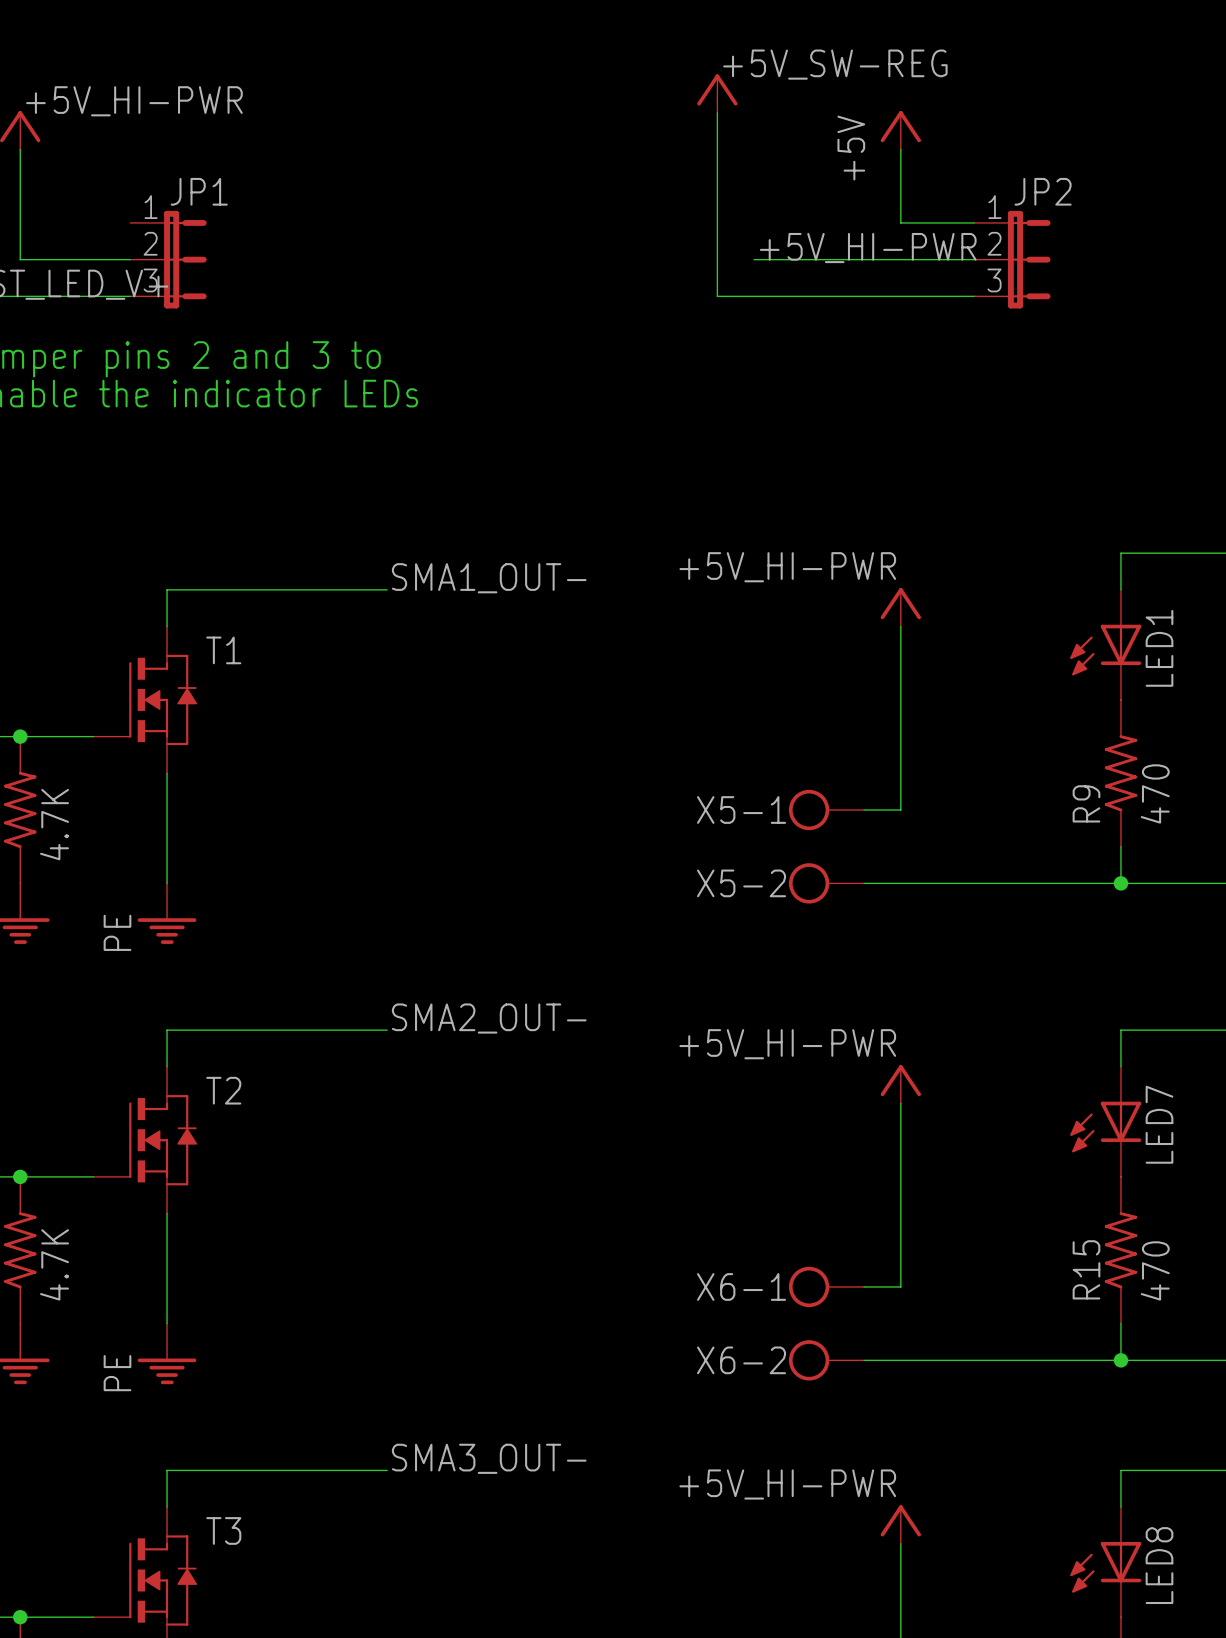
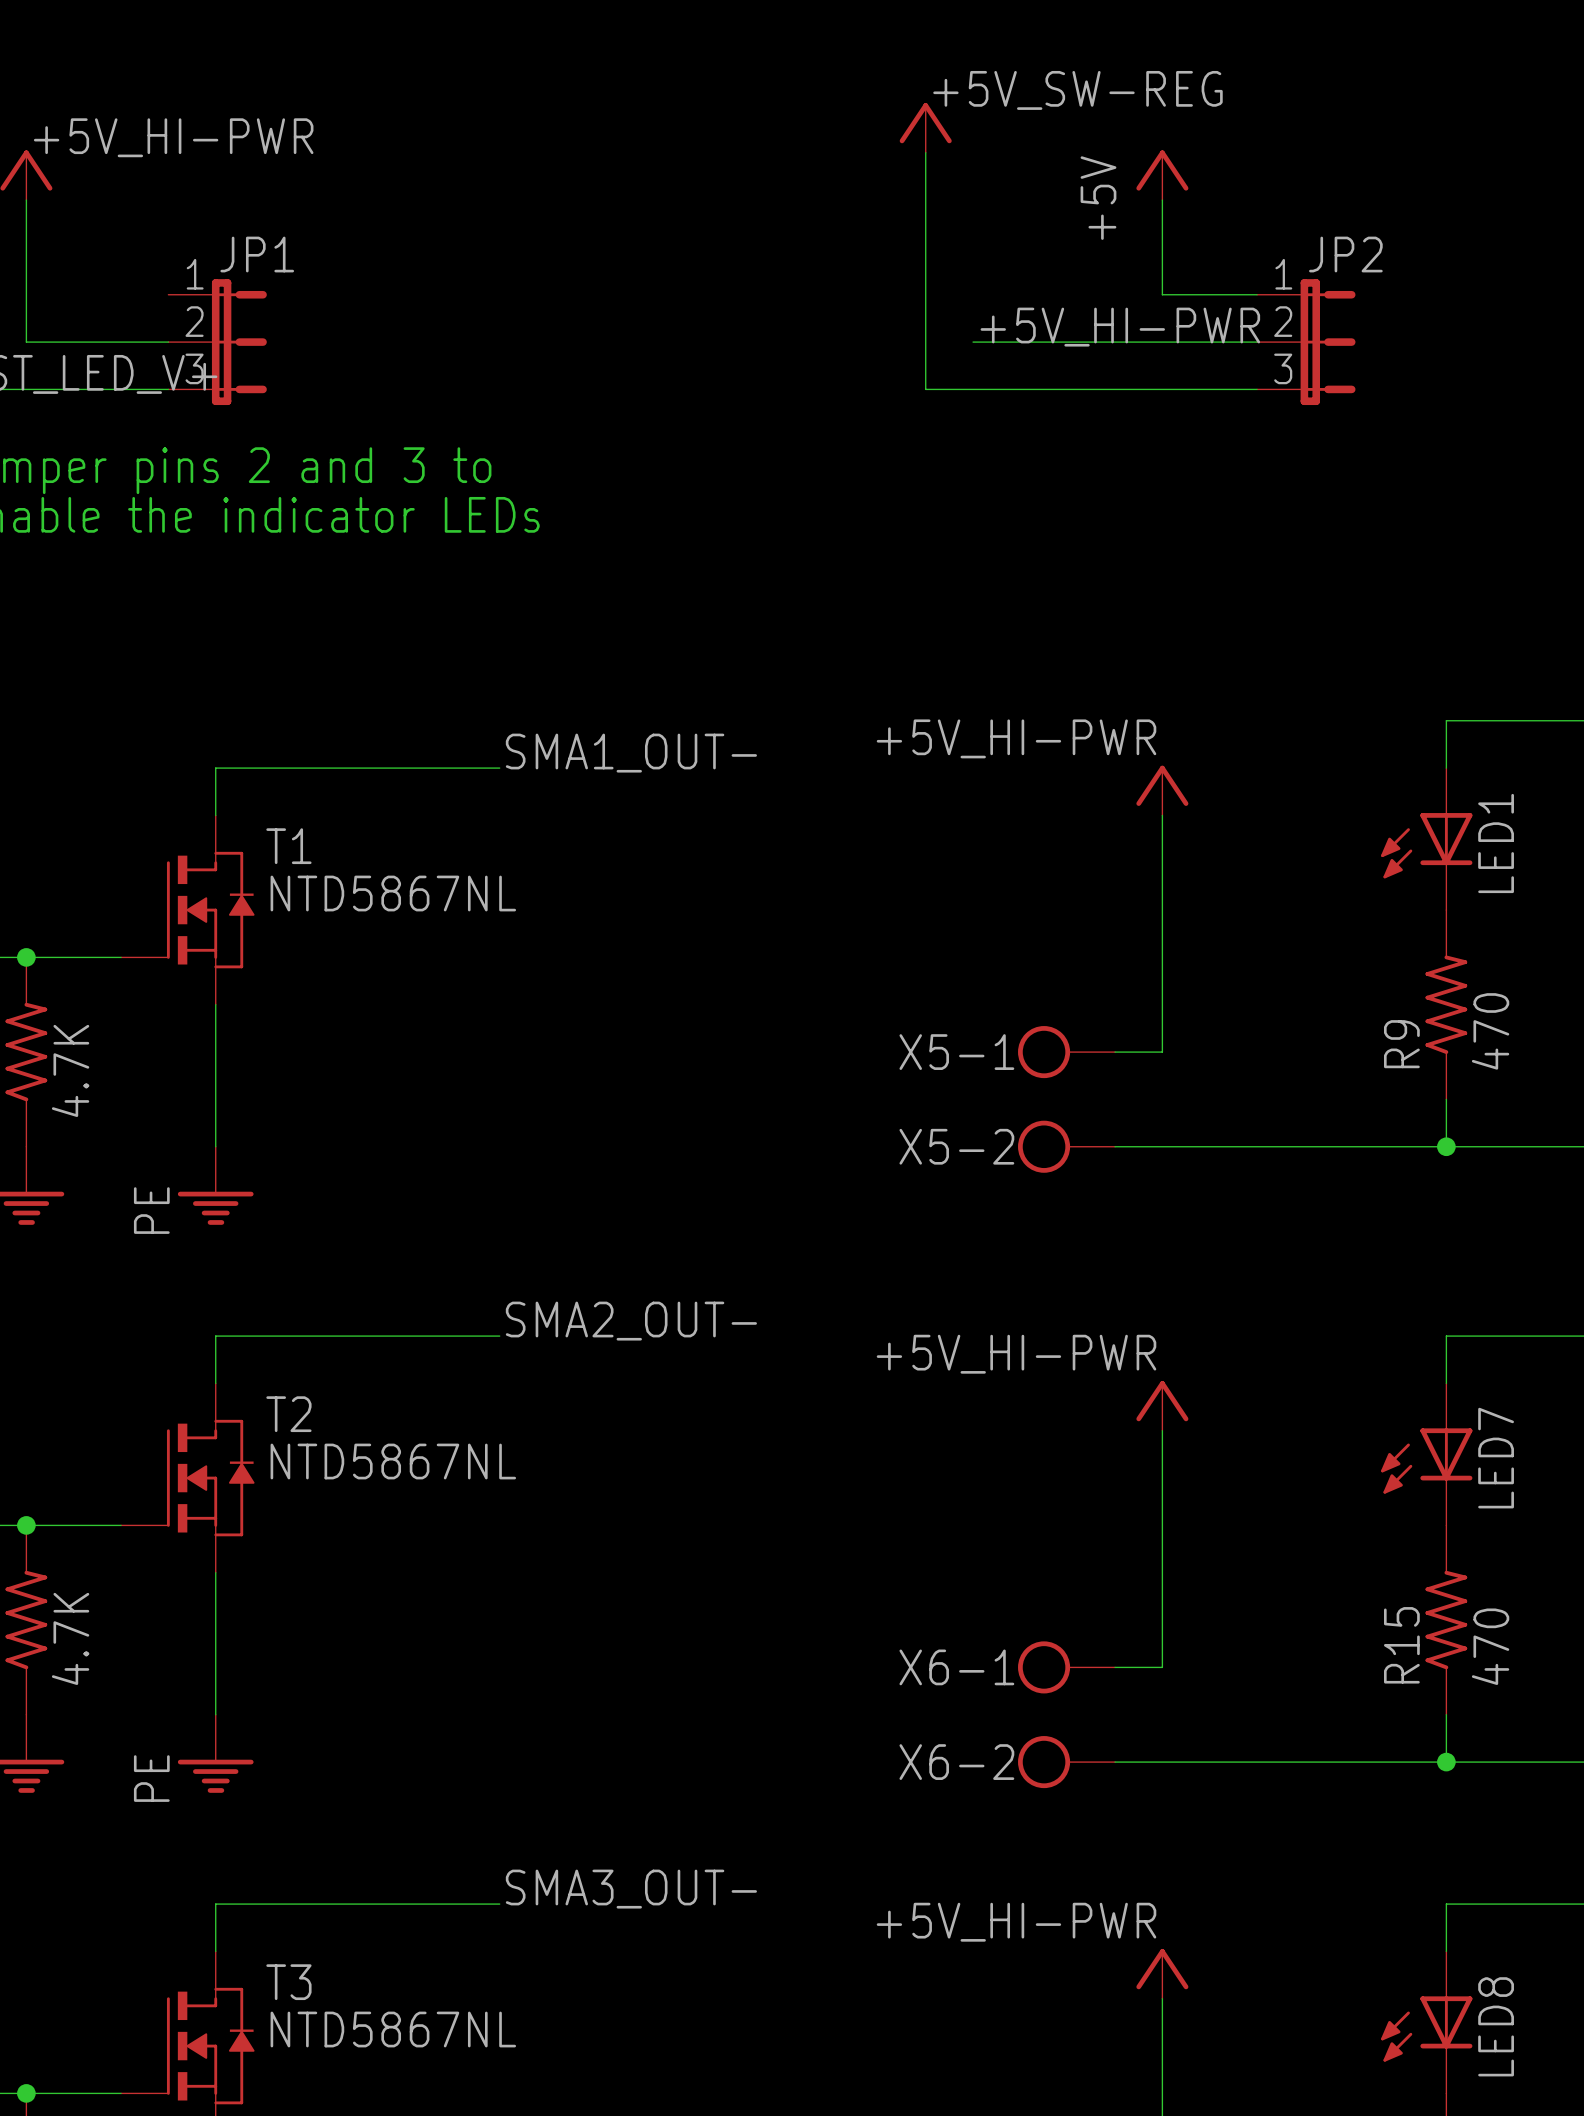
T1 value: none -> NTD5867NL (393, 893)
T2 value: none -> NTD5867NL (393, 1461)
T3 value: none -> NTD5867NL (393, 2029)

